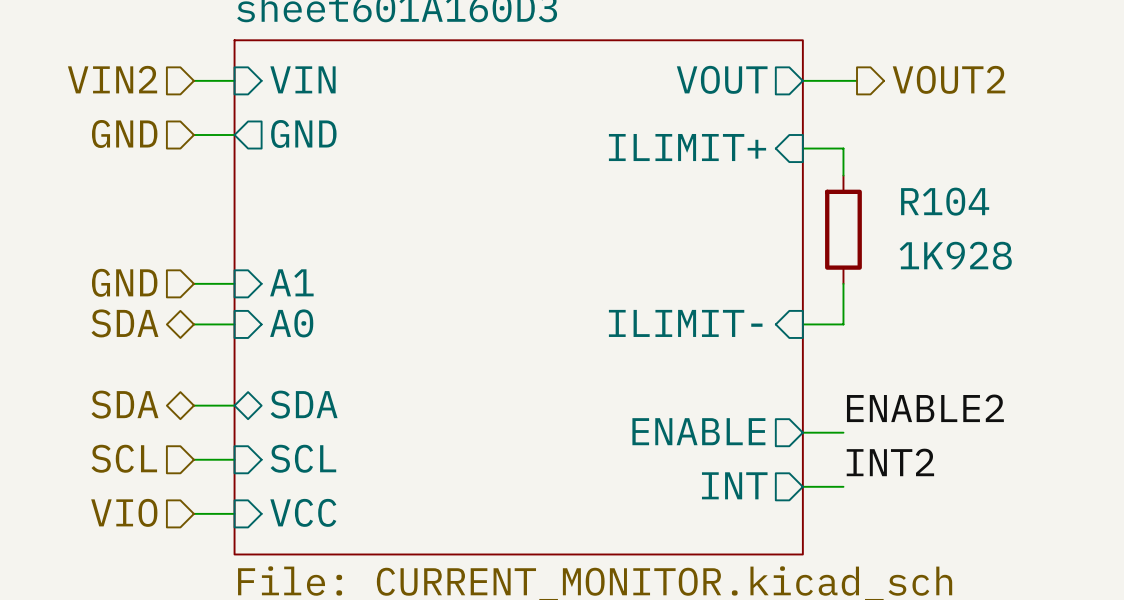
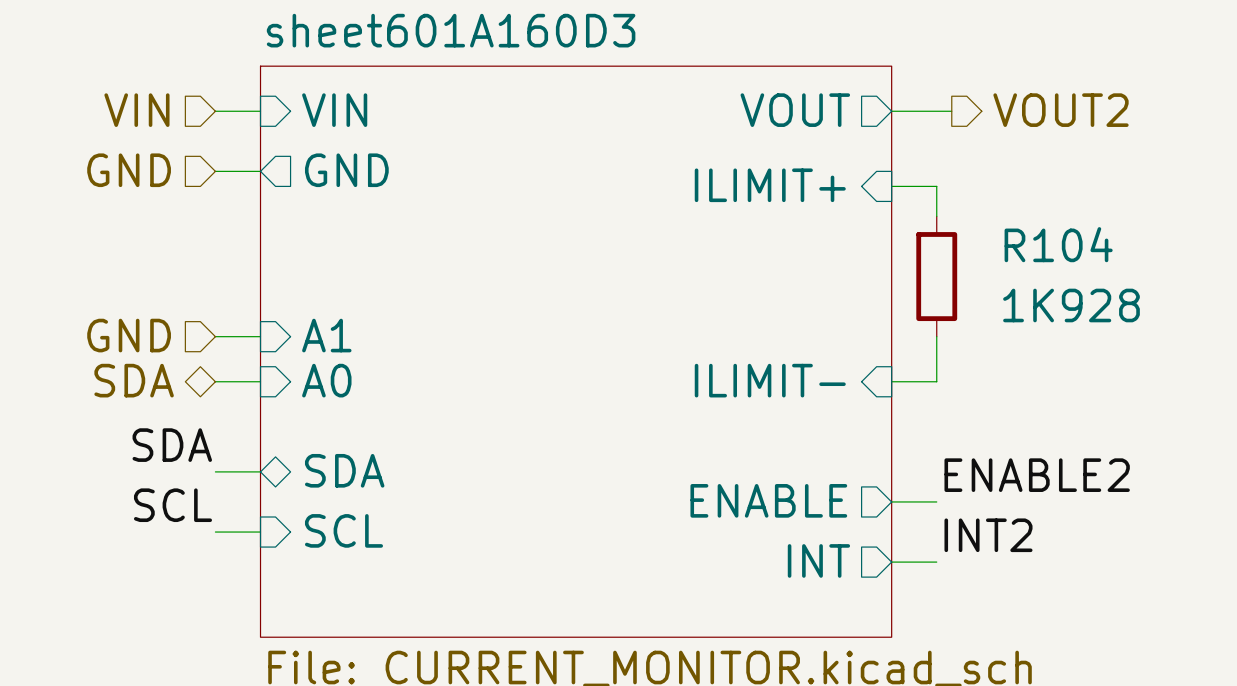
hierarchical label: VIN2 (112, 79) -> VIN (136, 110)
label: none -> SDA (172, 445)
hierarchical label: SDA (124, 404) -> none
label: none -> SCL (172, 505)
hierarchical label: SCL (124, 458) -> none
hierarchical label: VIO (124, 512) -> none
sheet pin: VCC (303, 512) -> none
wire: (193, 513) (234, 513) -> none

